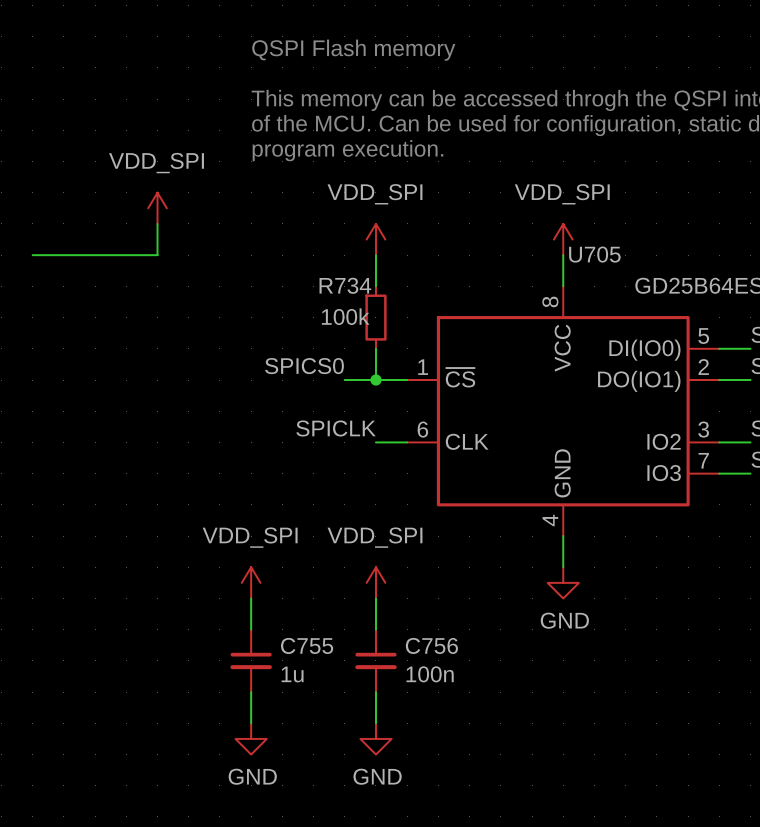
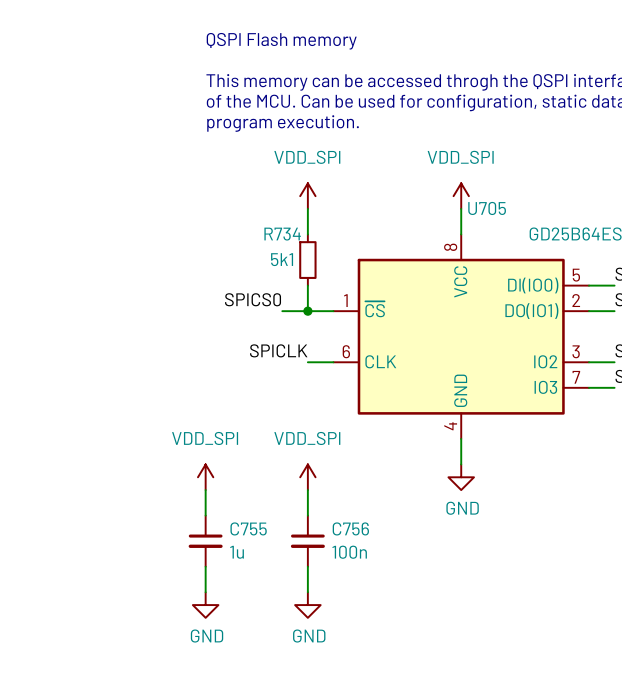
power symbol: VDD_SPI (157, 208) -> none
wire: (157, 223) (157, 255) (32, 255) -> none
R734 value: 100k (345, 316) -> 5k1 (282, 259)

